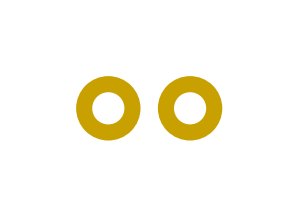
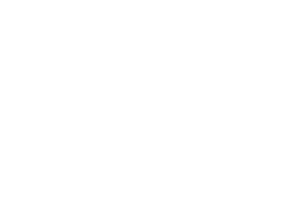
part: (149, 108) -> none

